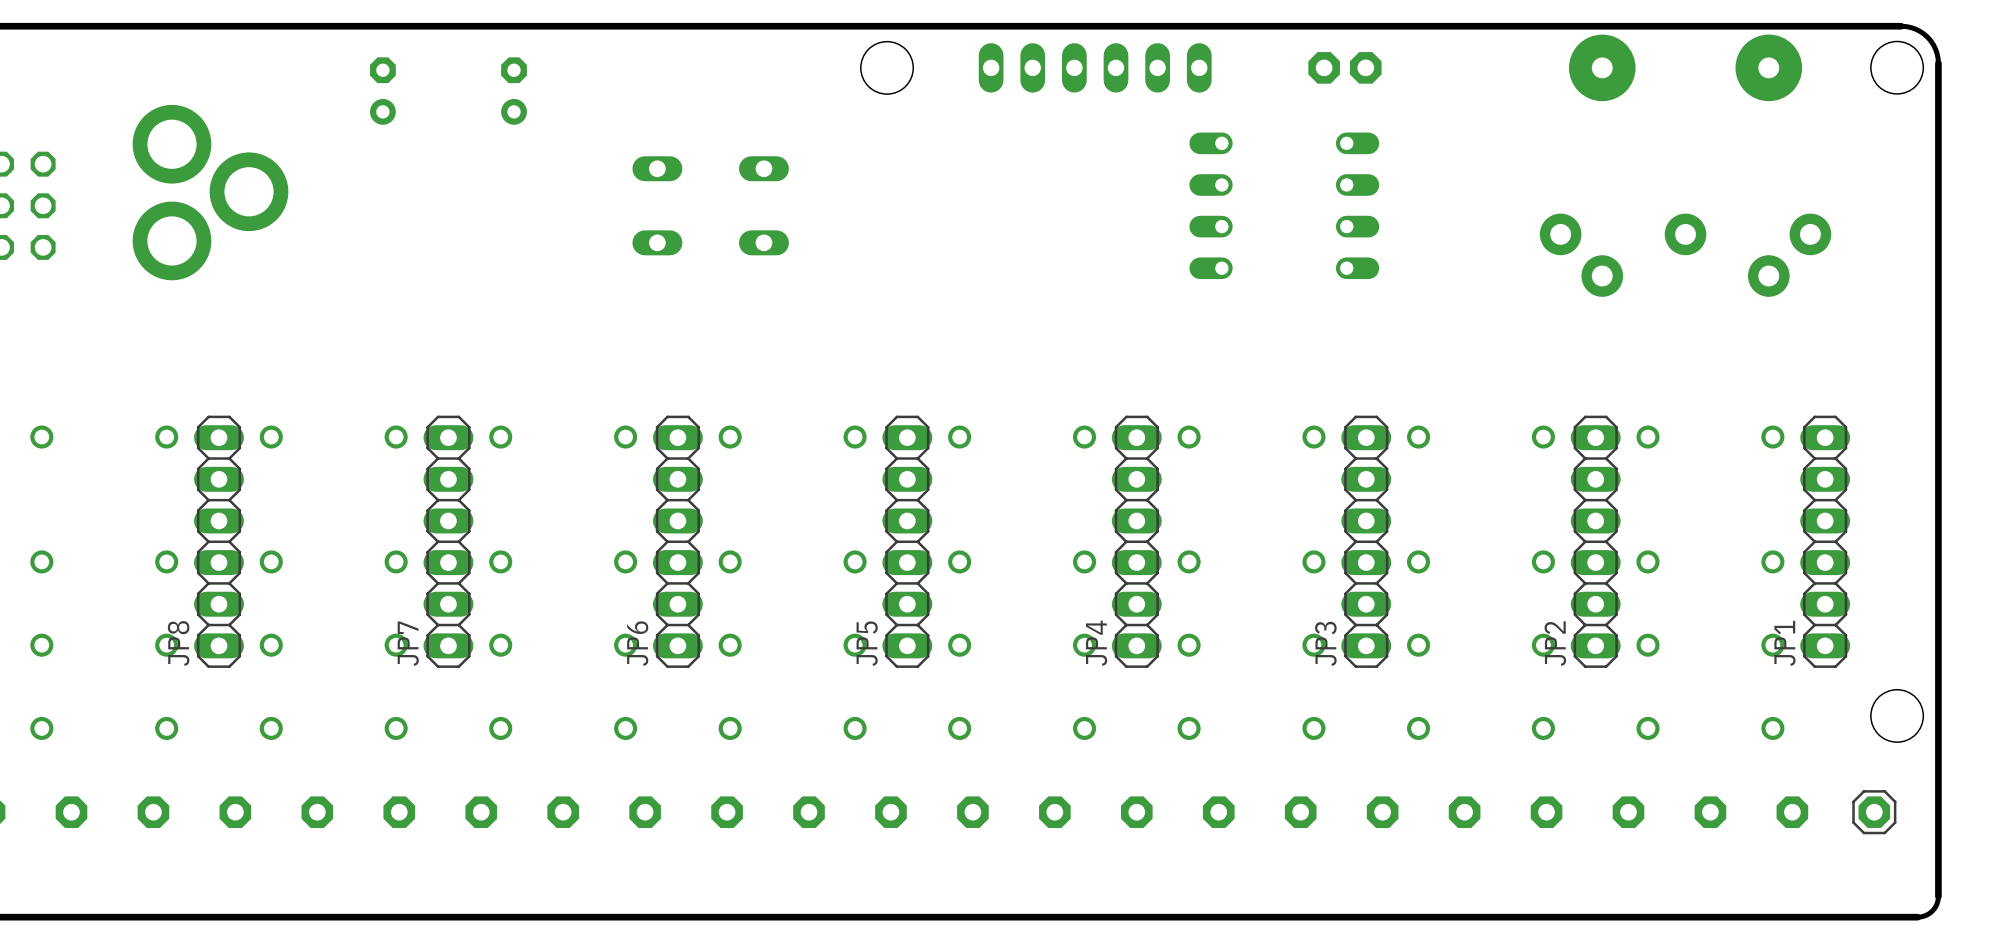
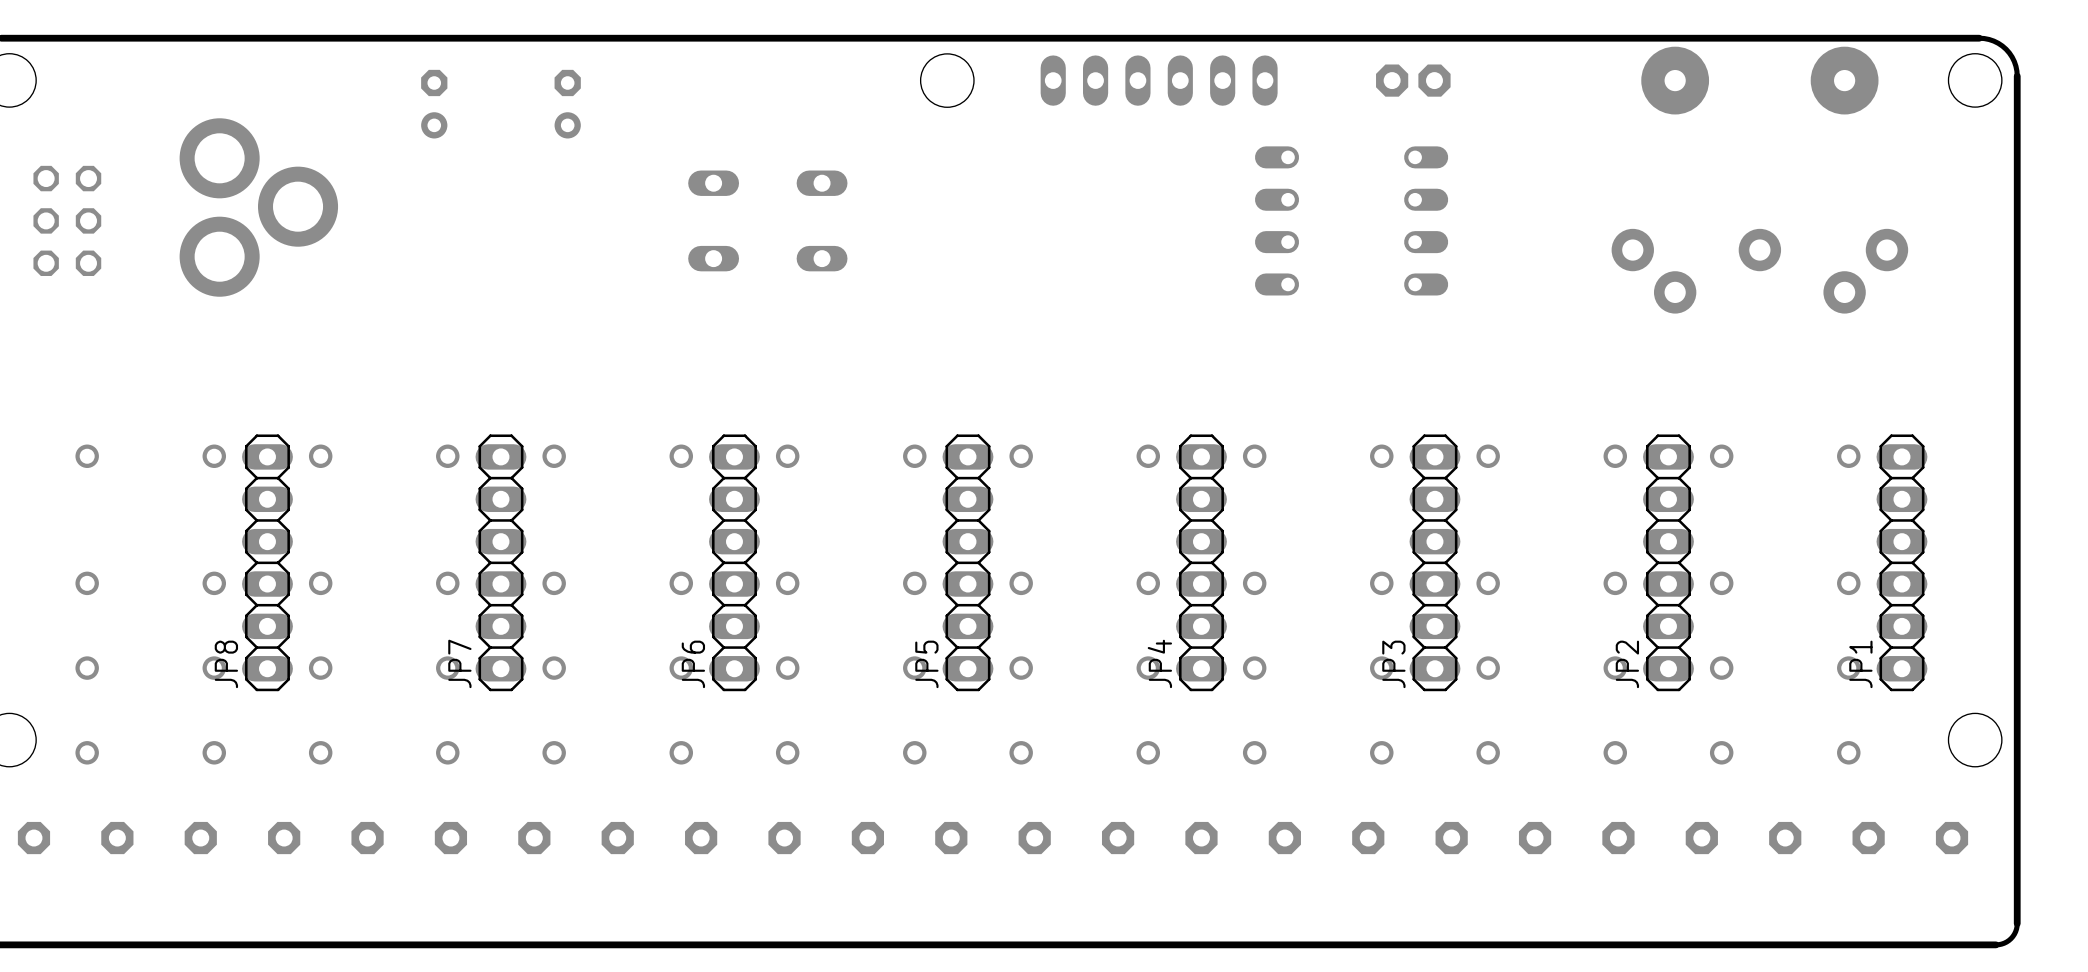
part side: bottom (1874, 812) -> top (1952, 838)

